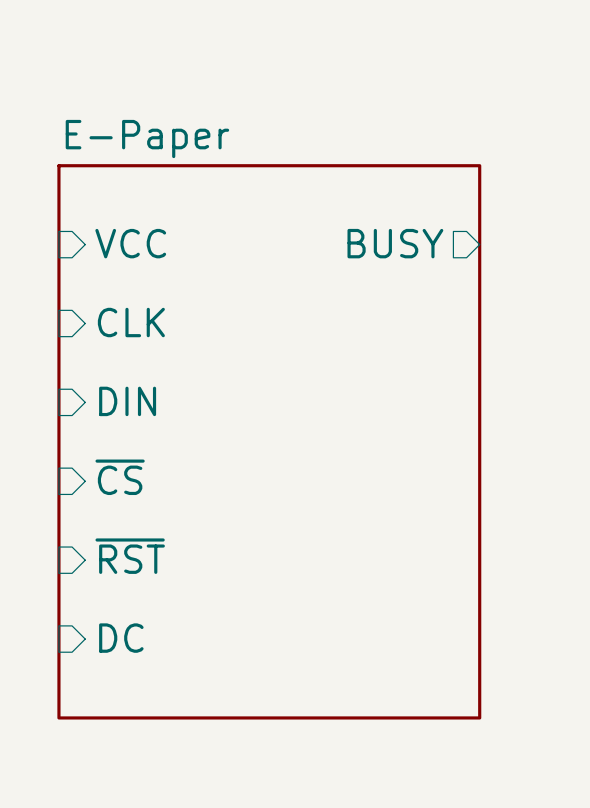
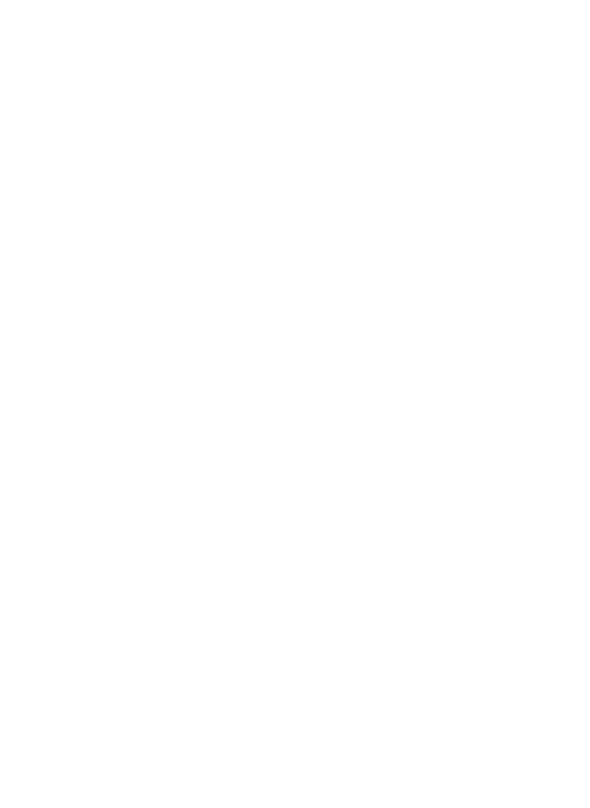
sheet pin: VCC (130, 243) -> none
sheet pin: BUSY (395, 243) -> none
sheet pin: CLK (131, 322) -> none
sheet pin: DIN (127, 401) -> none
sheet E-Paper: (269, 441) -> none
sheet pin: ~{CS} (120, 477) -> none
sheet pin: ~{RST} (130, 556) -> none
sheet pin: DC (121, 638) -> none

